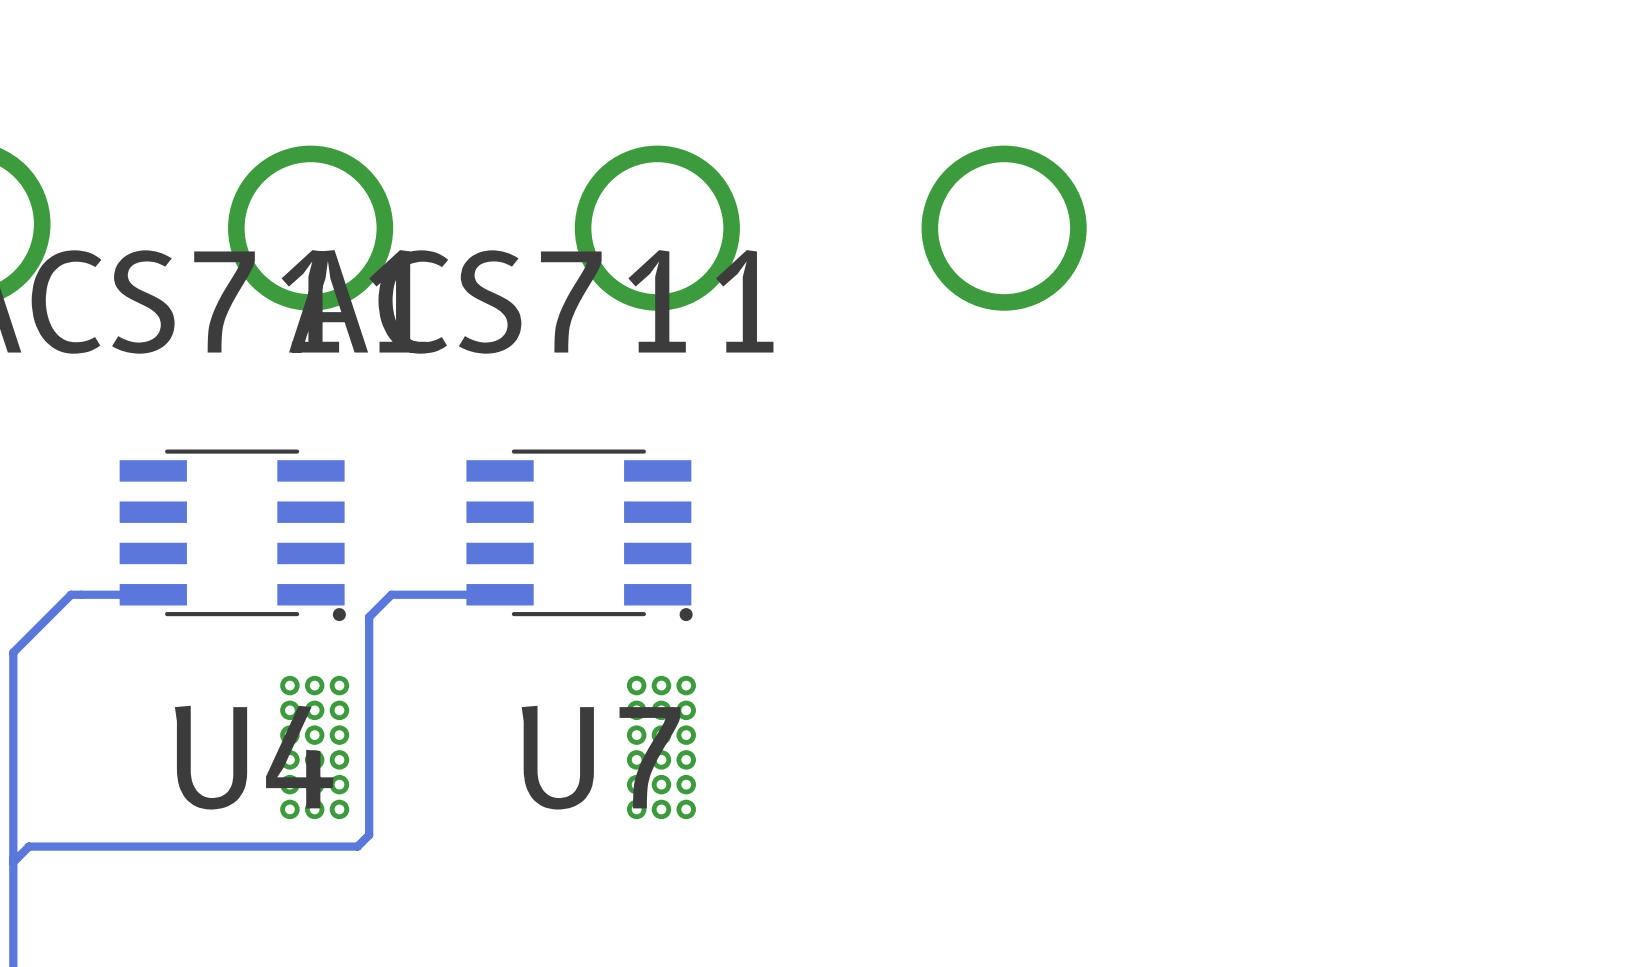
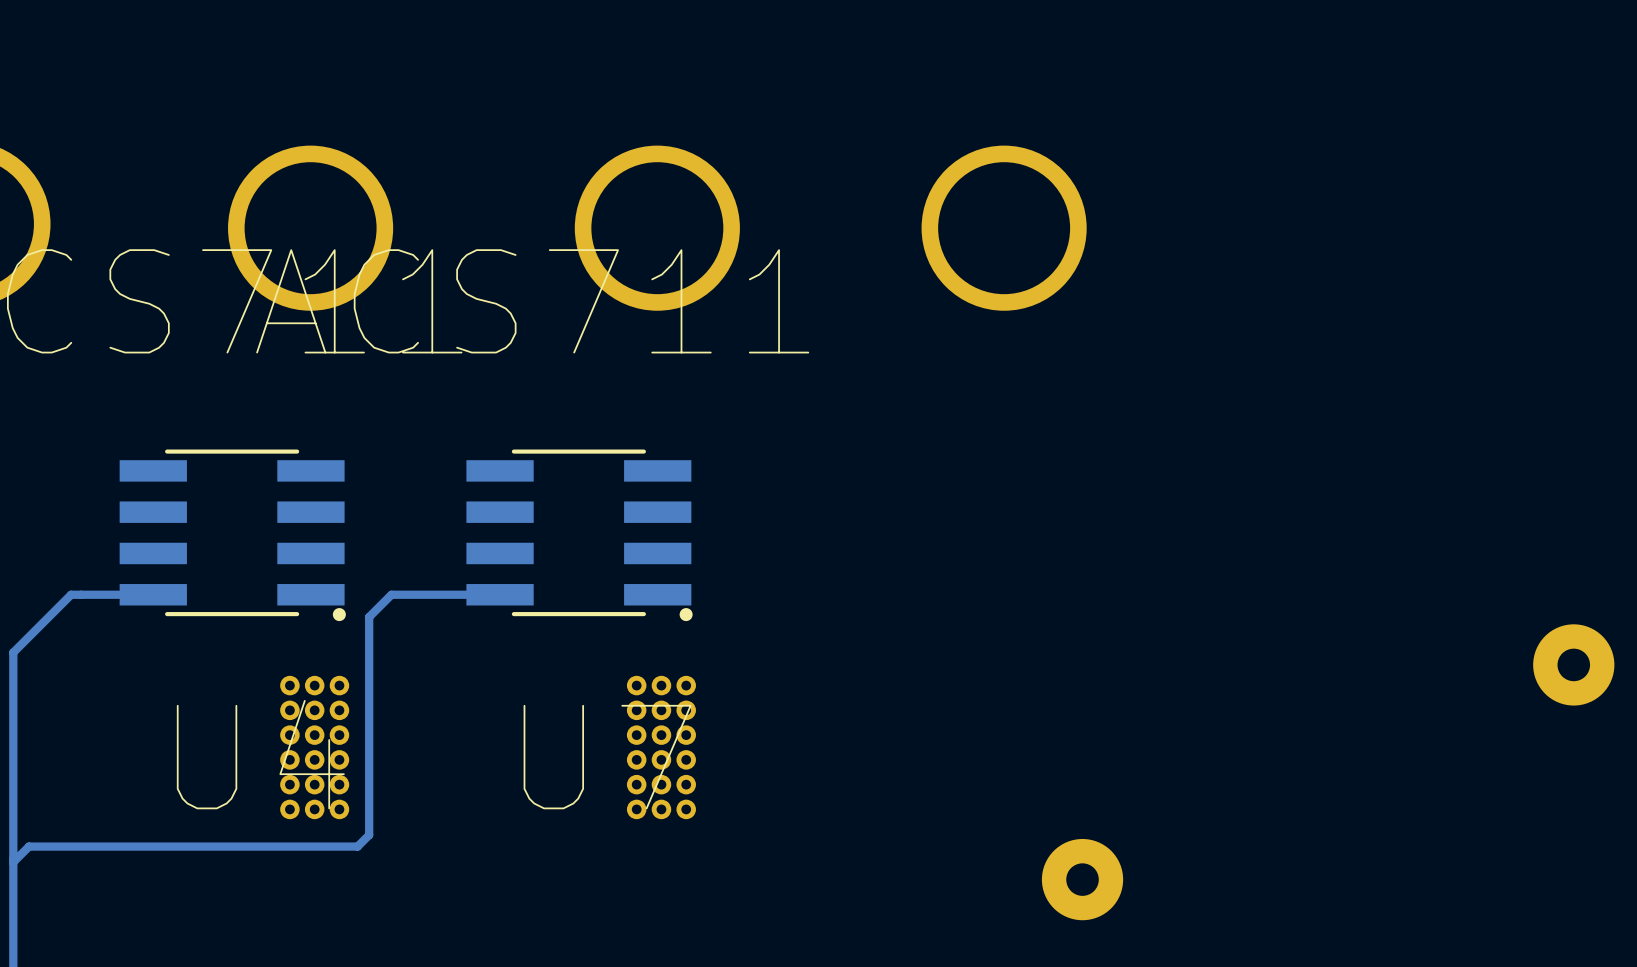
part: none -> (1573, 664)
part: none -> (1082, 879)

